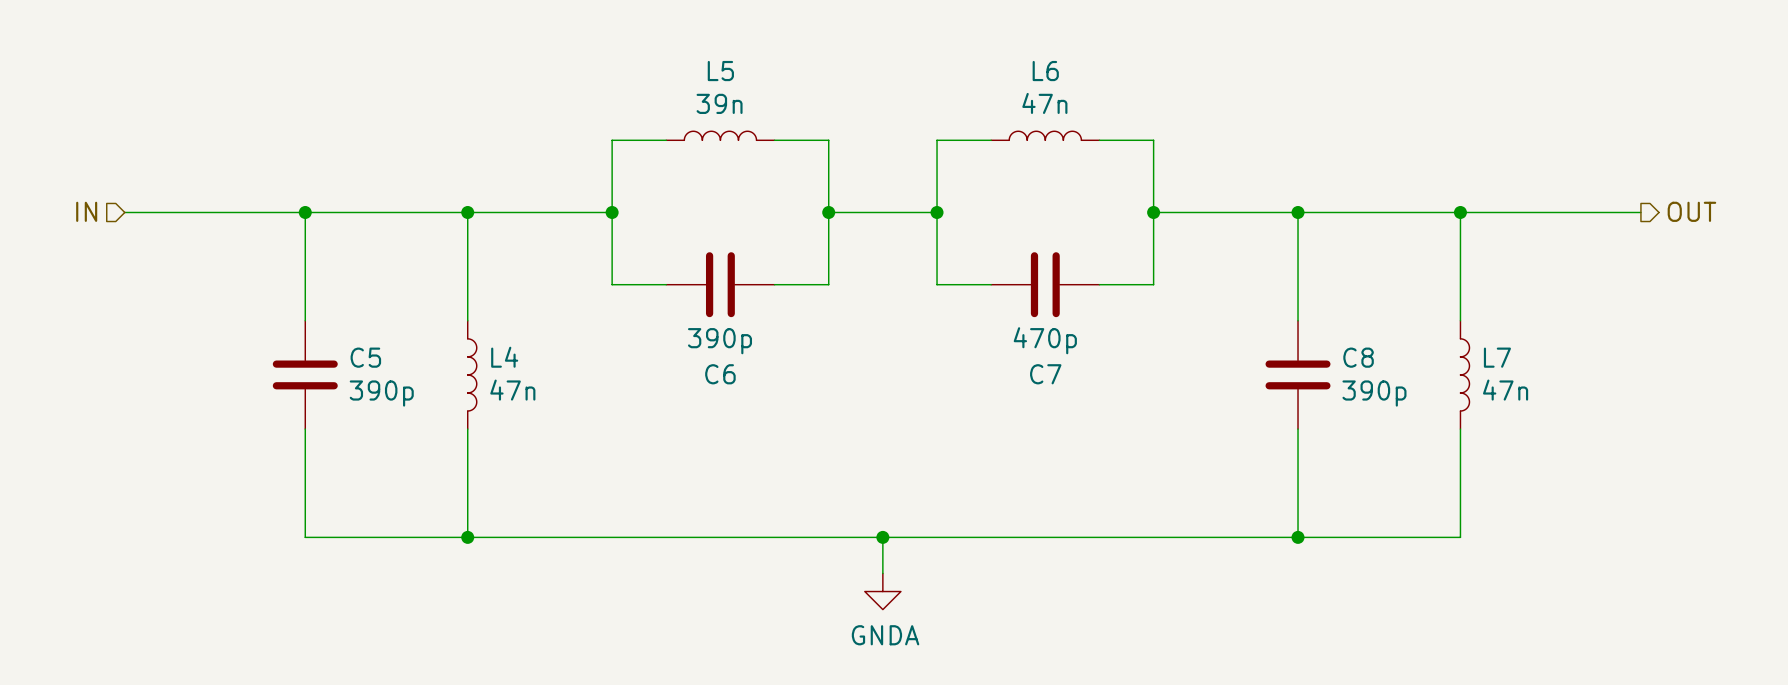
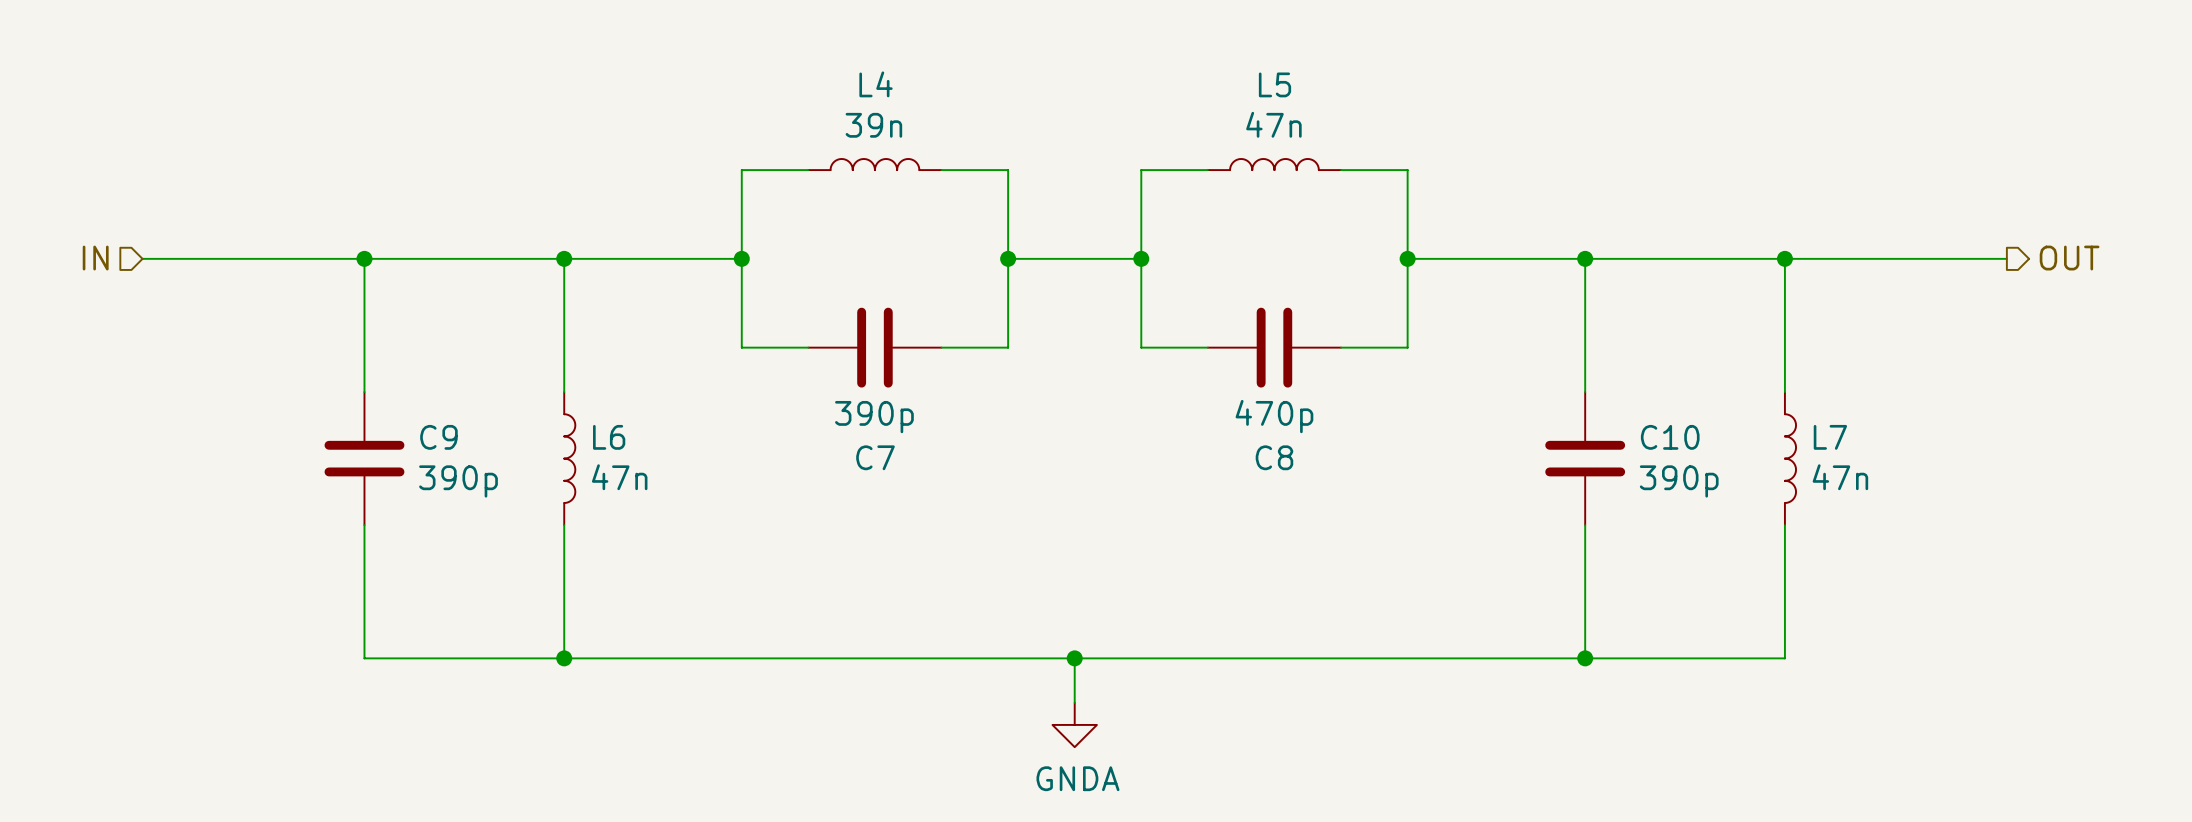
L5 name: L5 (720, 71) -> L4 (876, 84)
L6 name: L6 (1045, 71) -> L5 (1274, 84)
C5 name: C5 (365, 357) -> C9 (438, 437)
L4 name: L4 (504, 357) -> L6 (609, 437)
C8 name: C8 (1358, 357) -> C10 (1670, 437)
C6 name: C6 (720, 374) -> C7 (875, 457)
C7 name: C7 (1045, 374) -> C8 (1274, 457)

